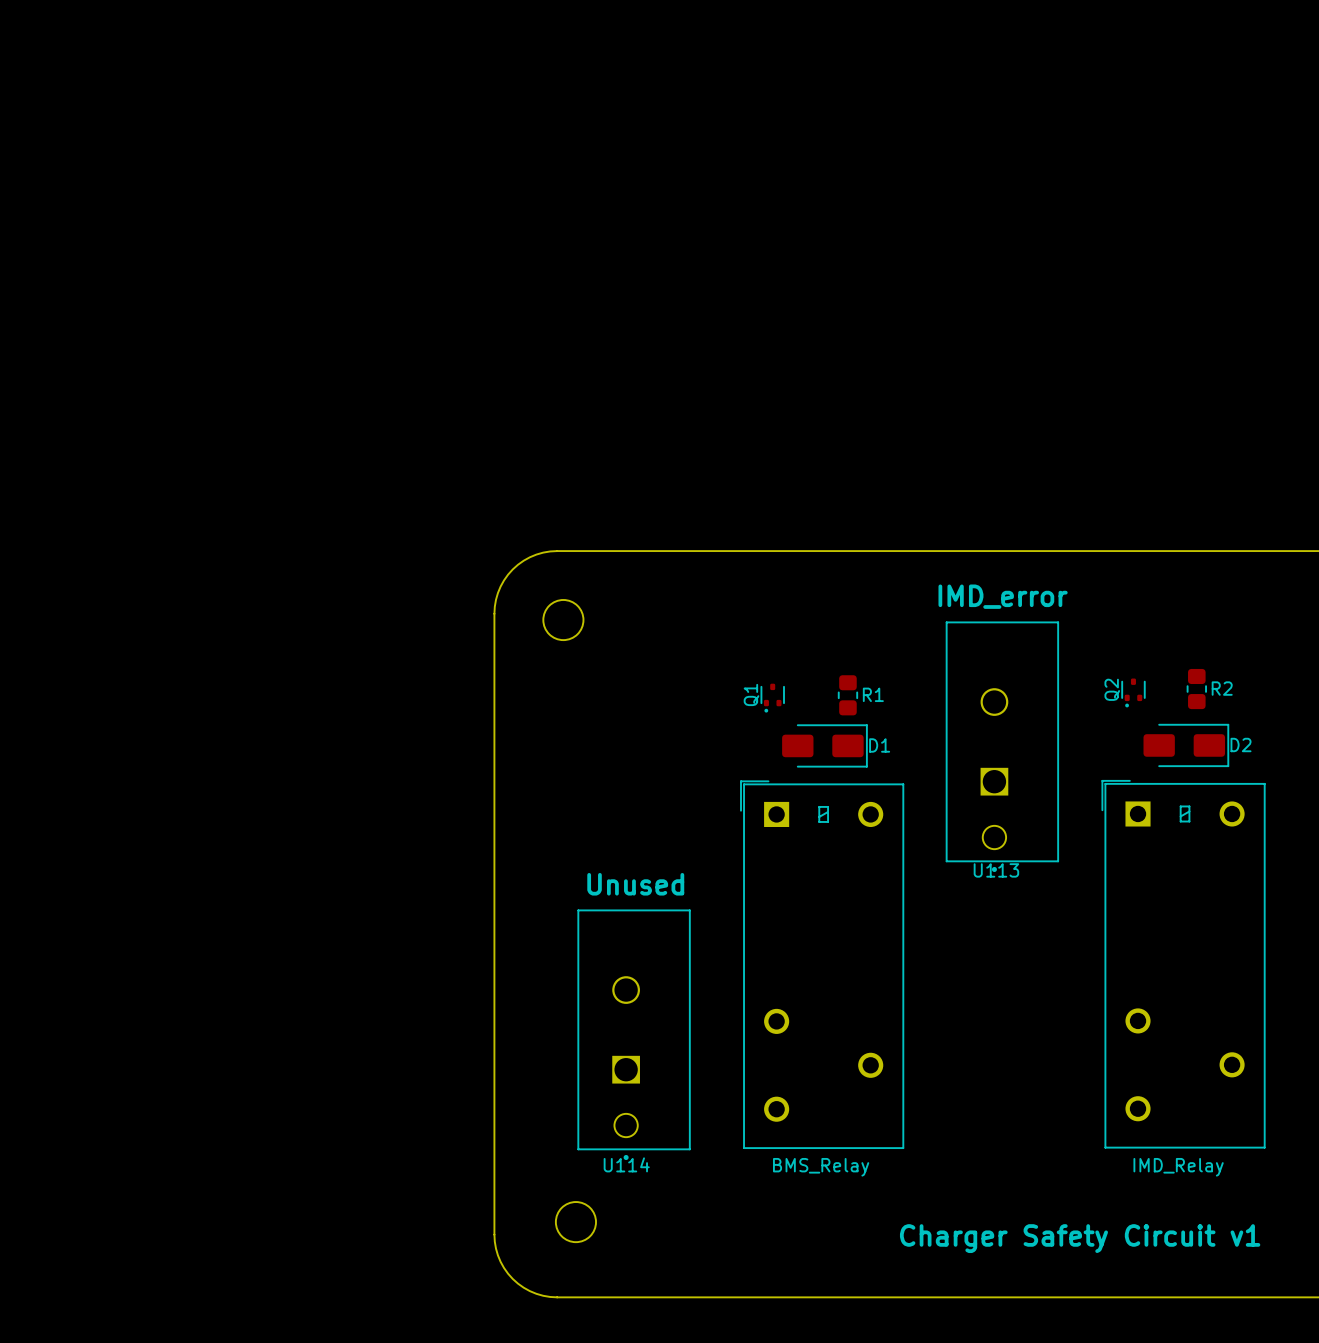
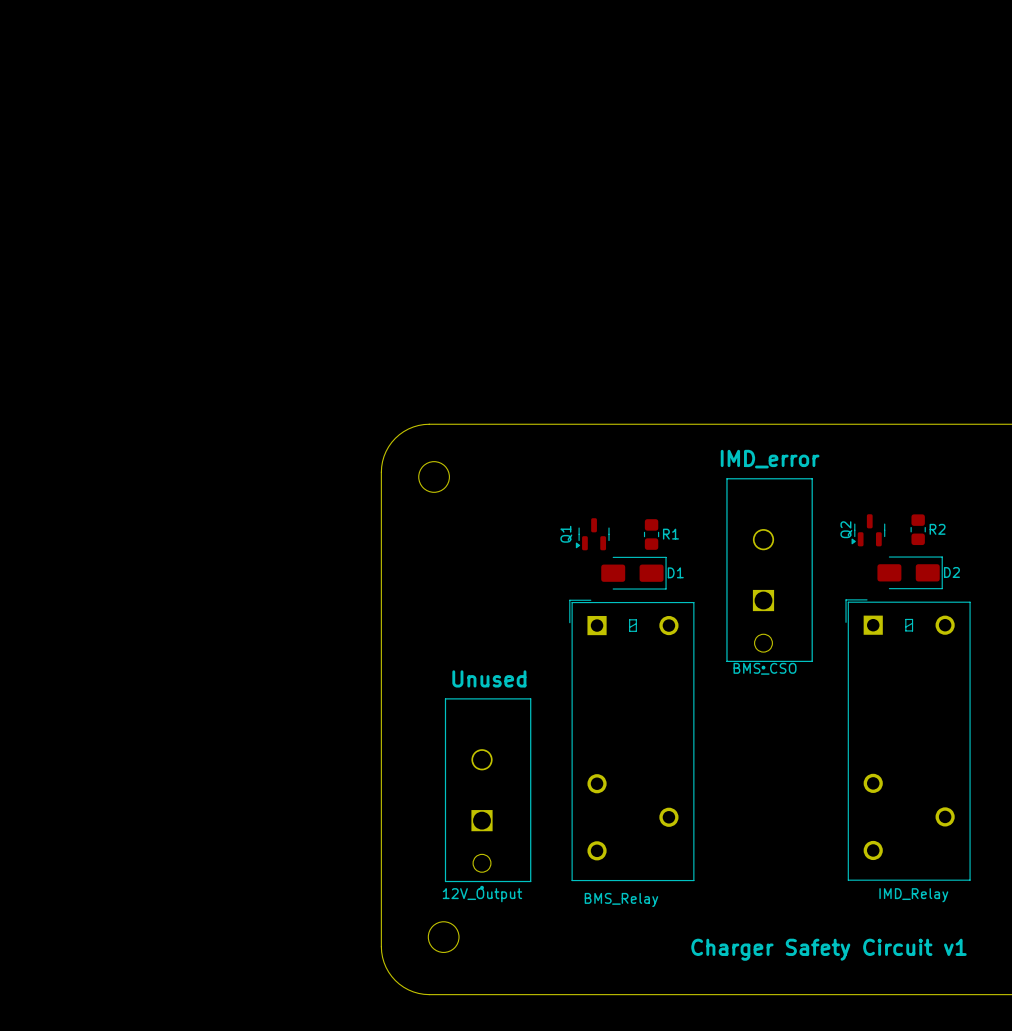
Q2 footprint: [1121, 678, 1146, 708] -> [851, 514, 886, 547]
Q1 footprint: [760, 683, 785, 713] -> [575, 518, 610, 551]
U113 name: U113 (996, 870) -> BMS_CSO (765, 668)
U114 name: U114 (626, 1164) -> 12V_Output (482, 895)
BMS_Relay value: BMS_Relay (821, 1167) -> none
IMD_Relay value: IMD_Relay (1178, 1167) -> none
IMD_Relay name: none -> IMD_Relay (913, 895)
BMS_Relay name: none -> BMS_Relay (621, 900)

